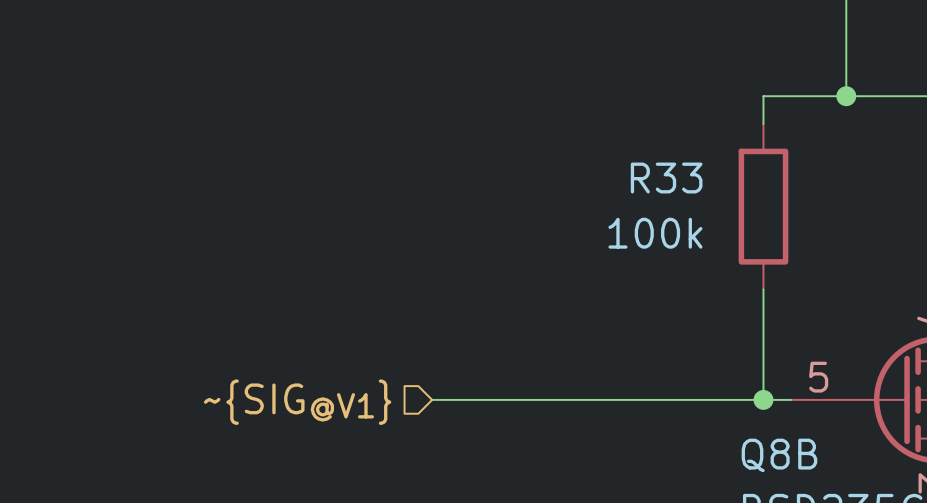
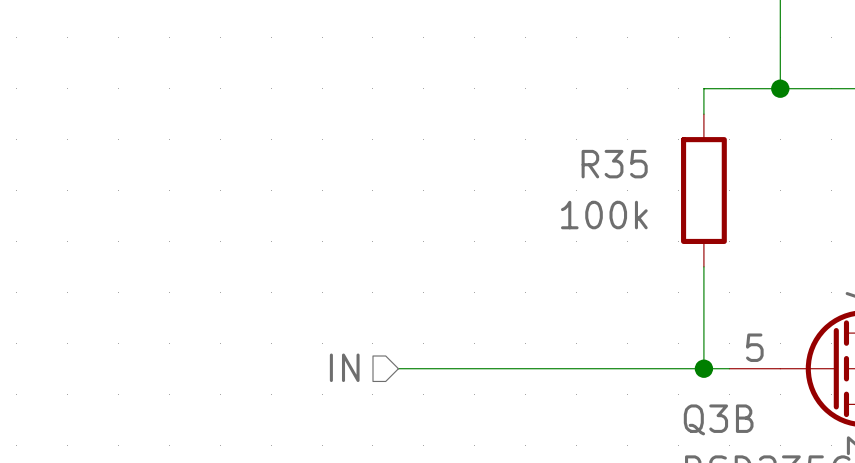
R33 name: R33 (666, 178) -> R35 (614, 164)
hierarchical label: ~{SIG@V1} (297, 402) -> IN (344, 367)
Q8B name: Q8B (779, 455) -> Q3B (718, 419)

